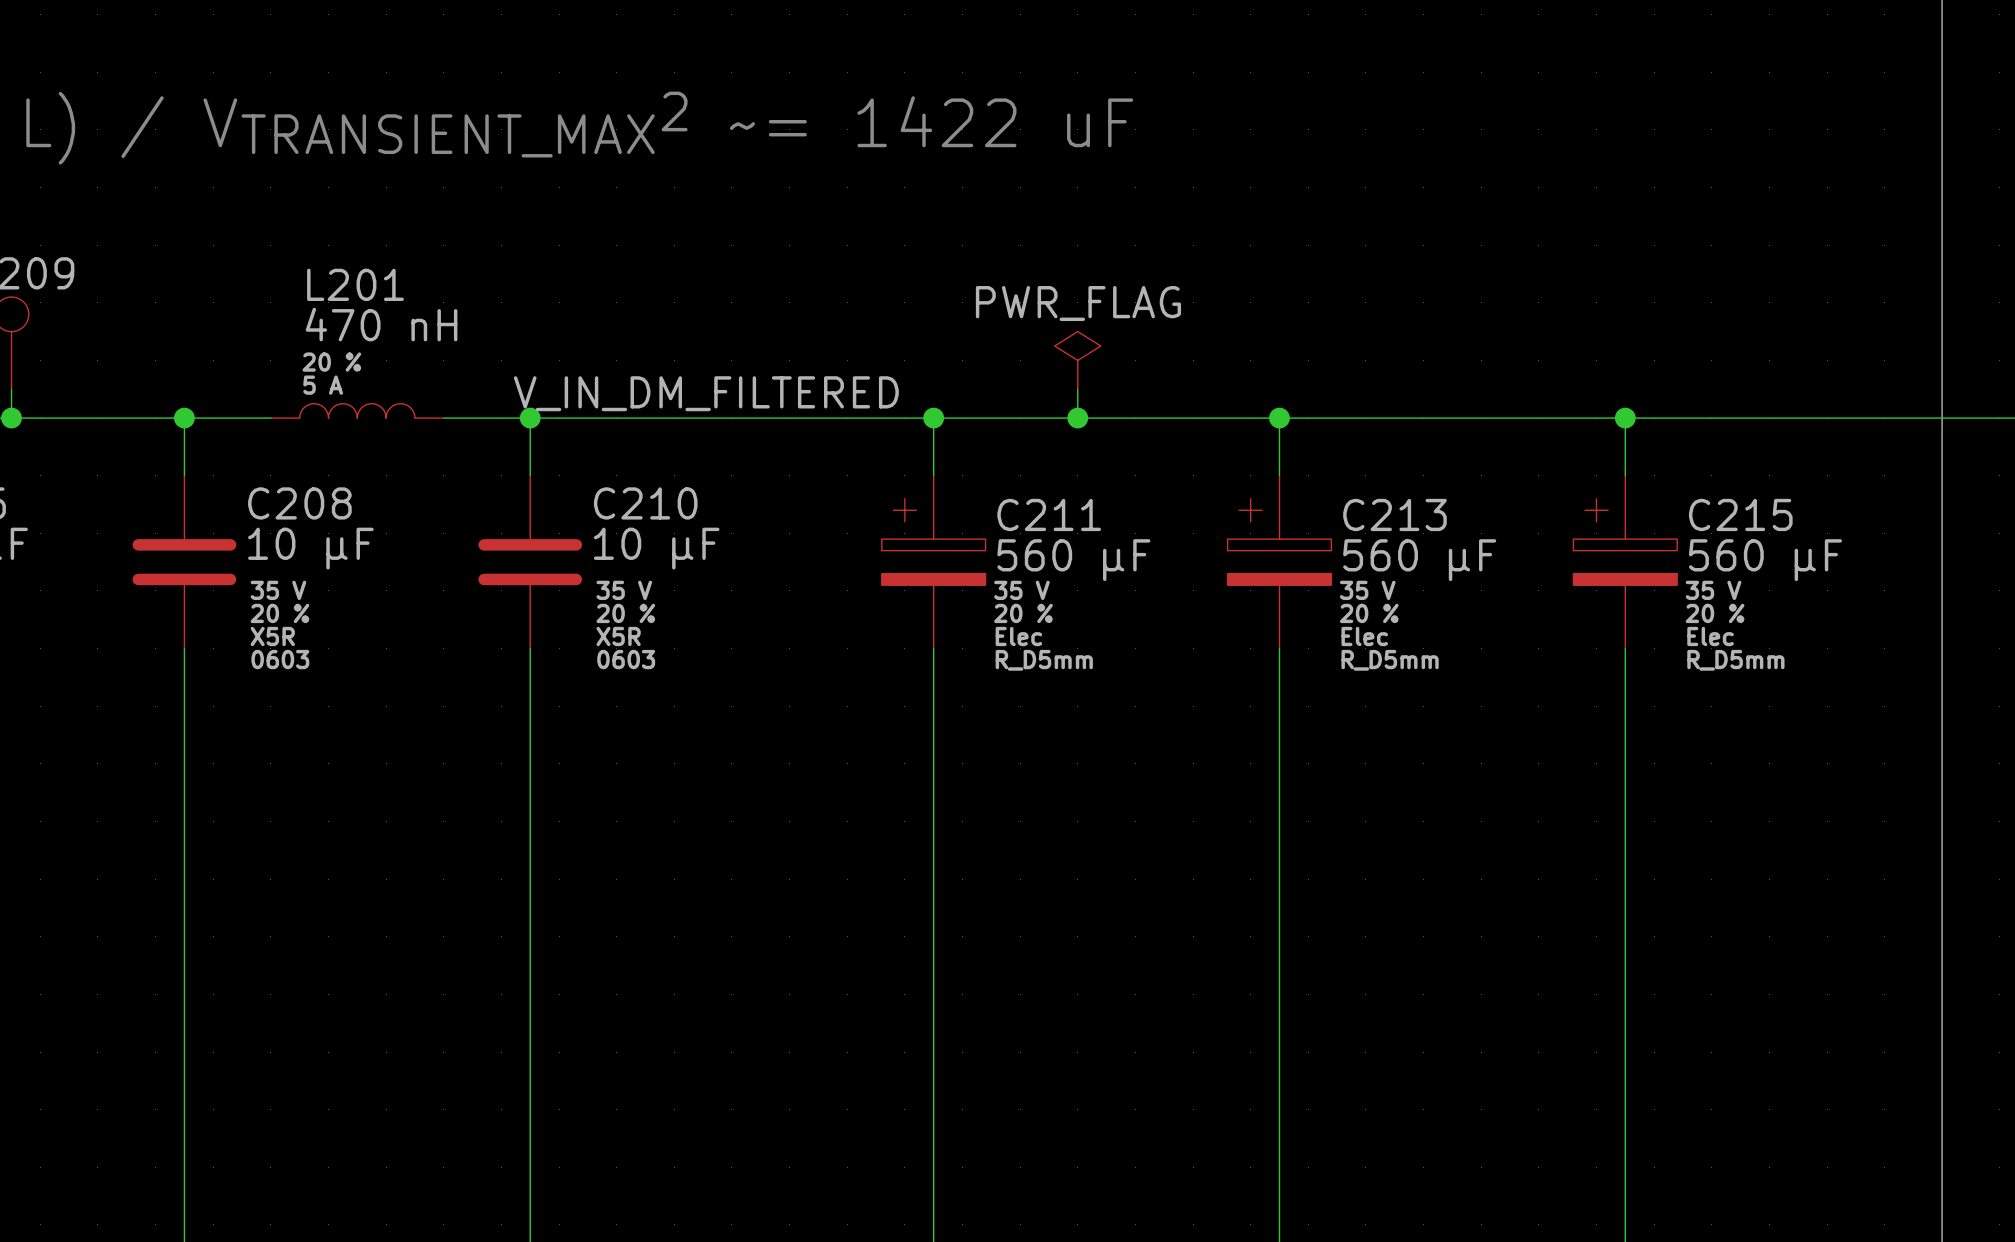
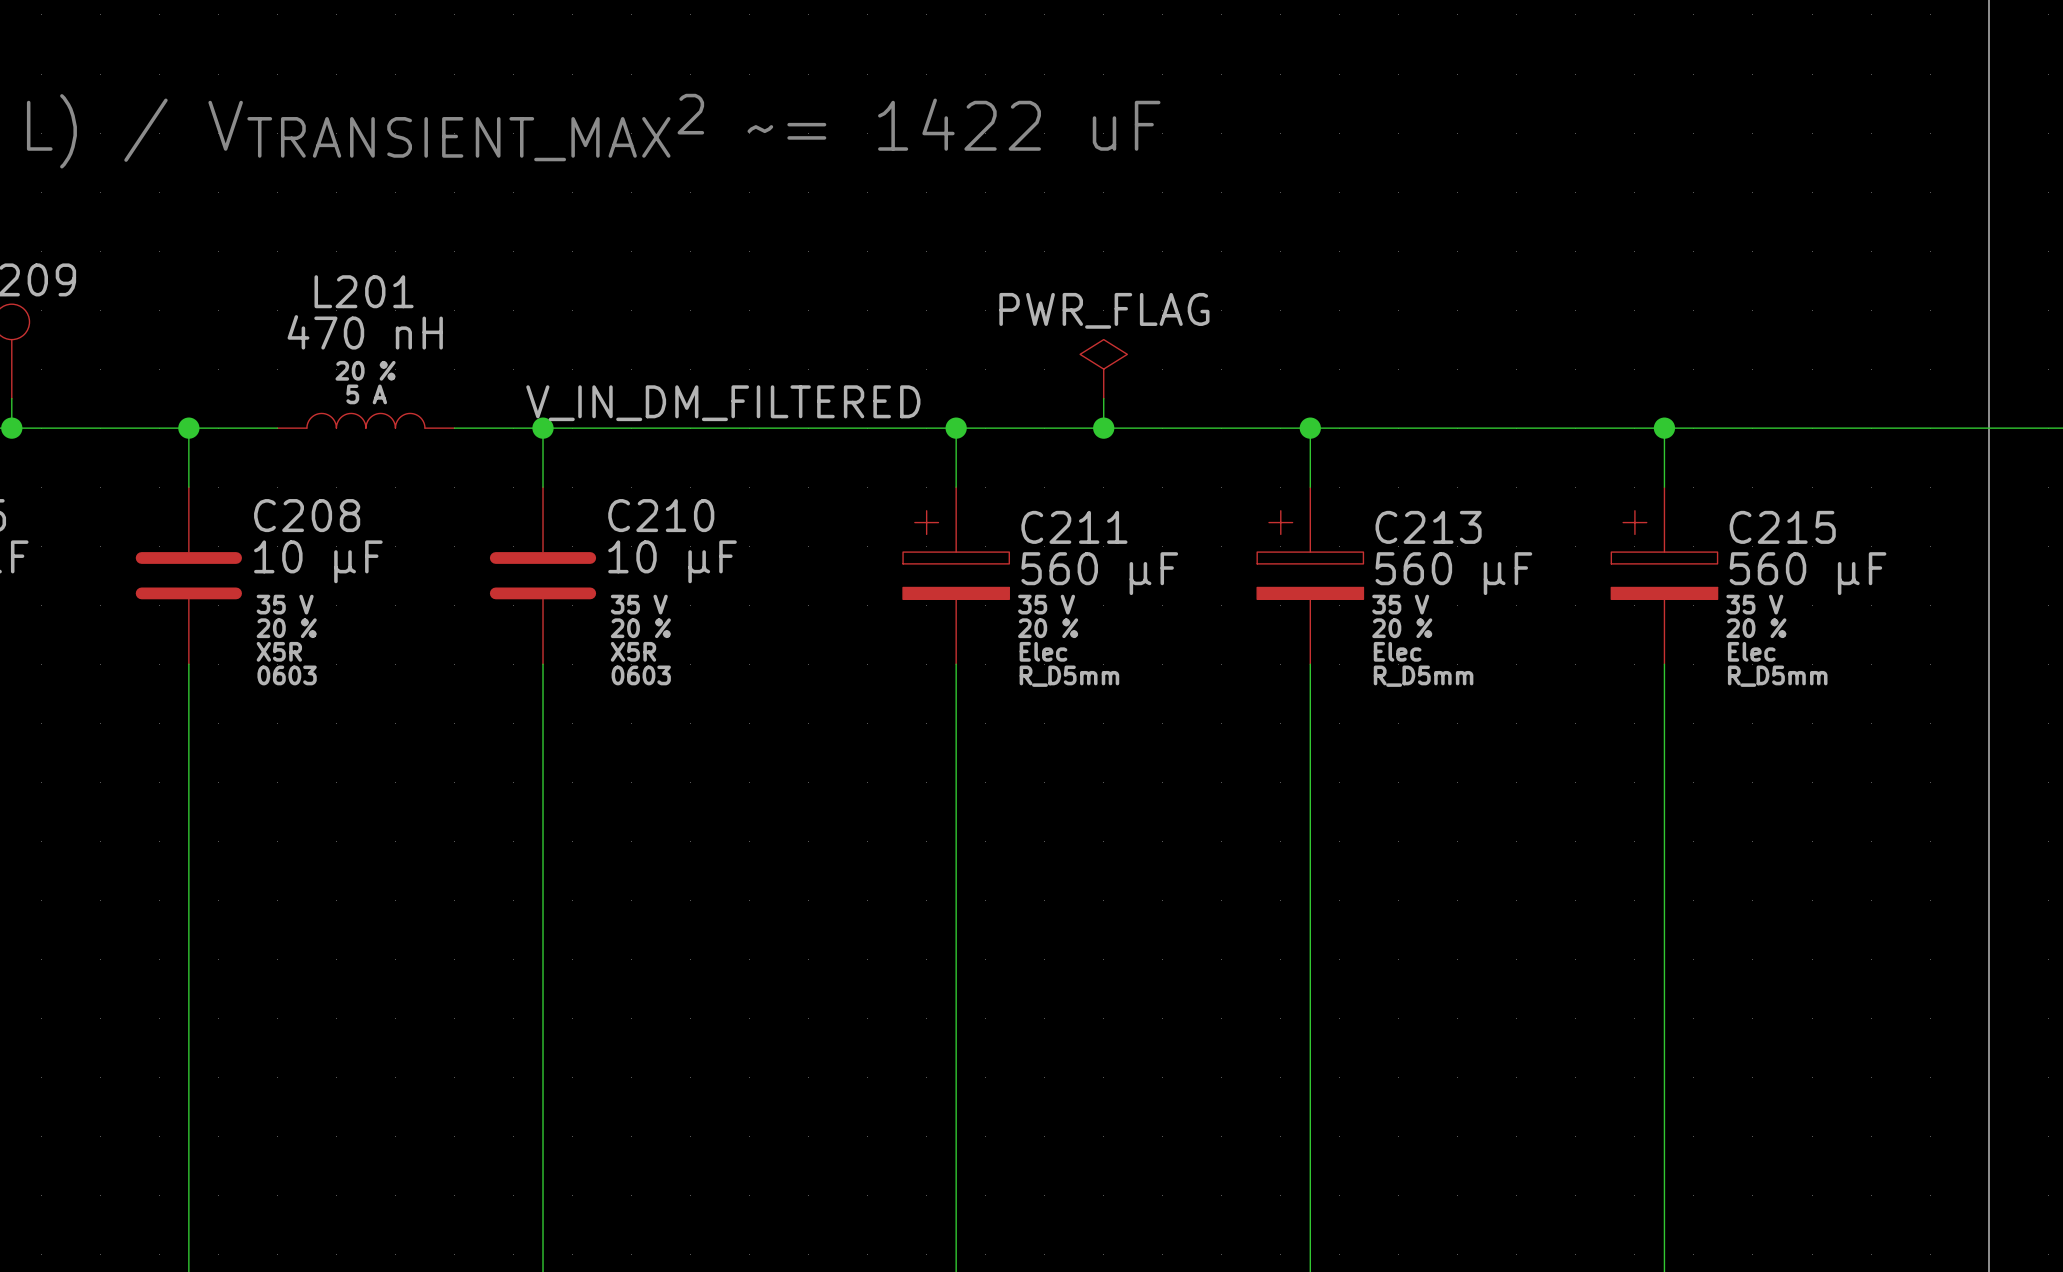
L201 value position: 470 nH (381, 324) -> 470 nH (365, 332)
L201 text position: 20 % (331, 362) -> 20 % (365, 370)
L201 text position: 5 A (323, 385) -> 5 A (366, 394)

